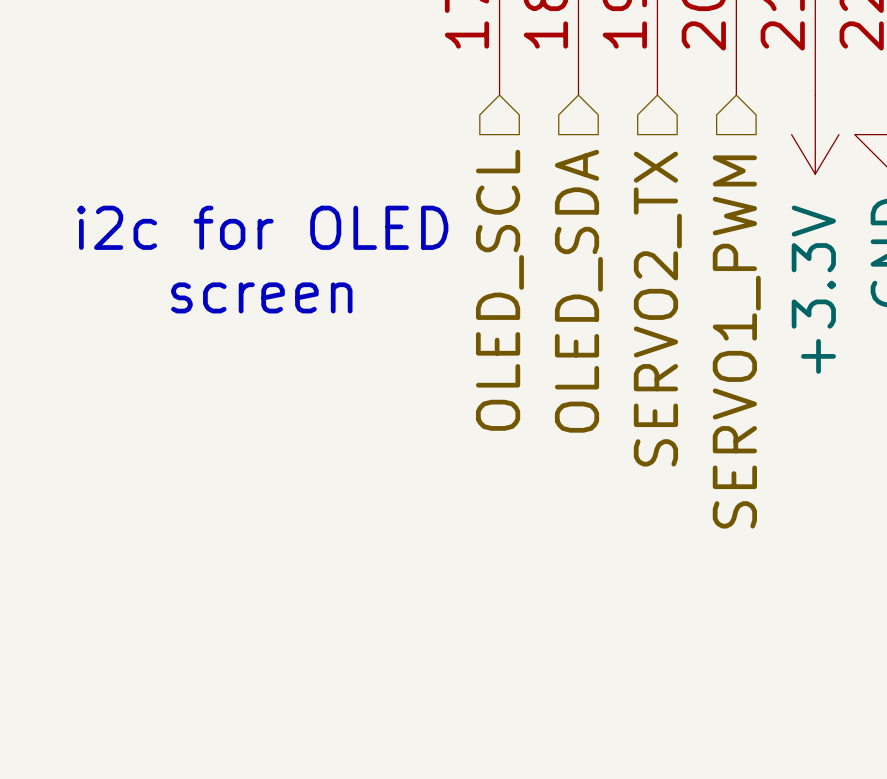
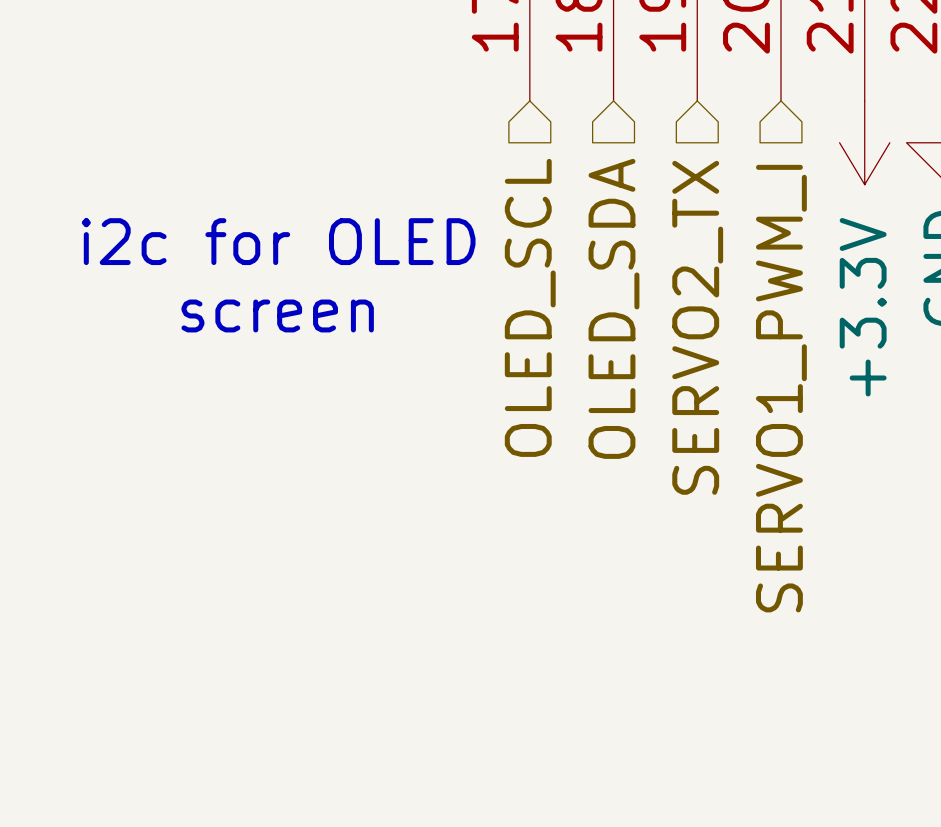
hierarchical label: SERVO1_PWM (736, 341) -> SERVO1_PWM_I (781, 388)

